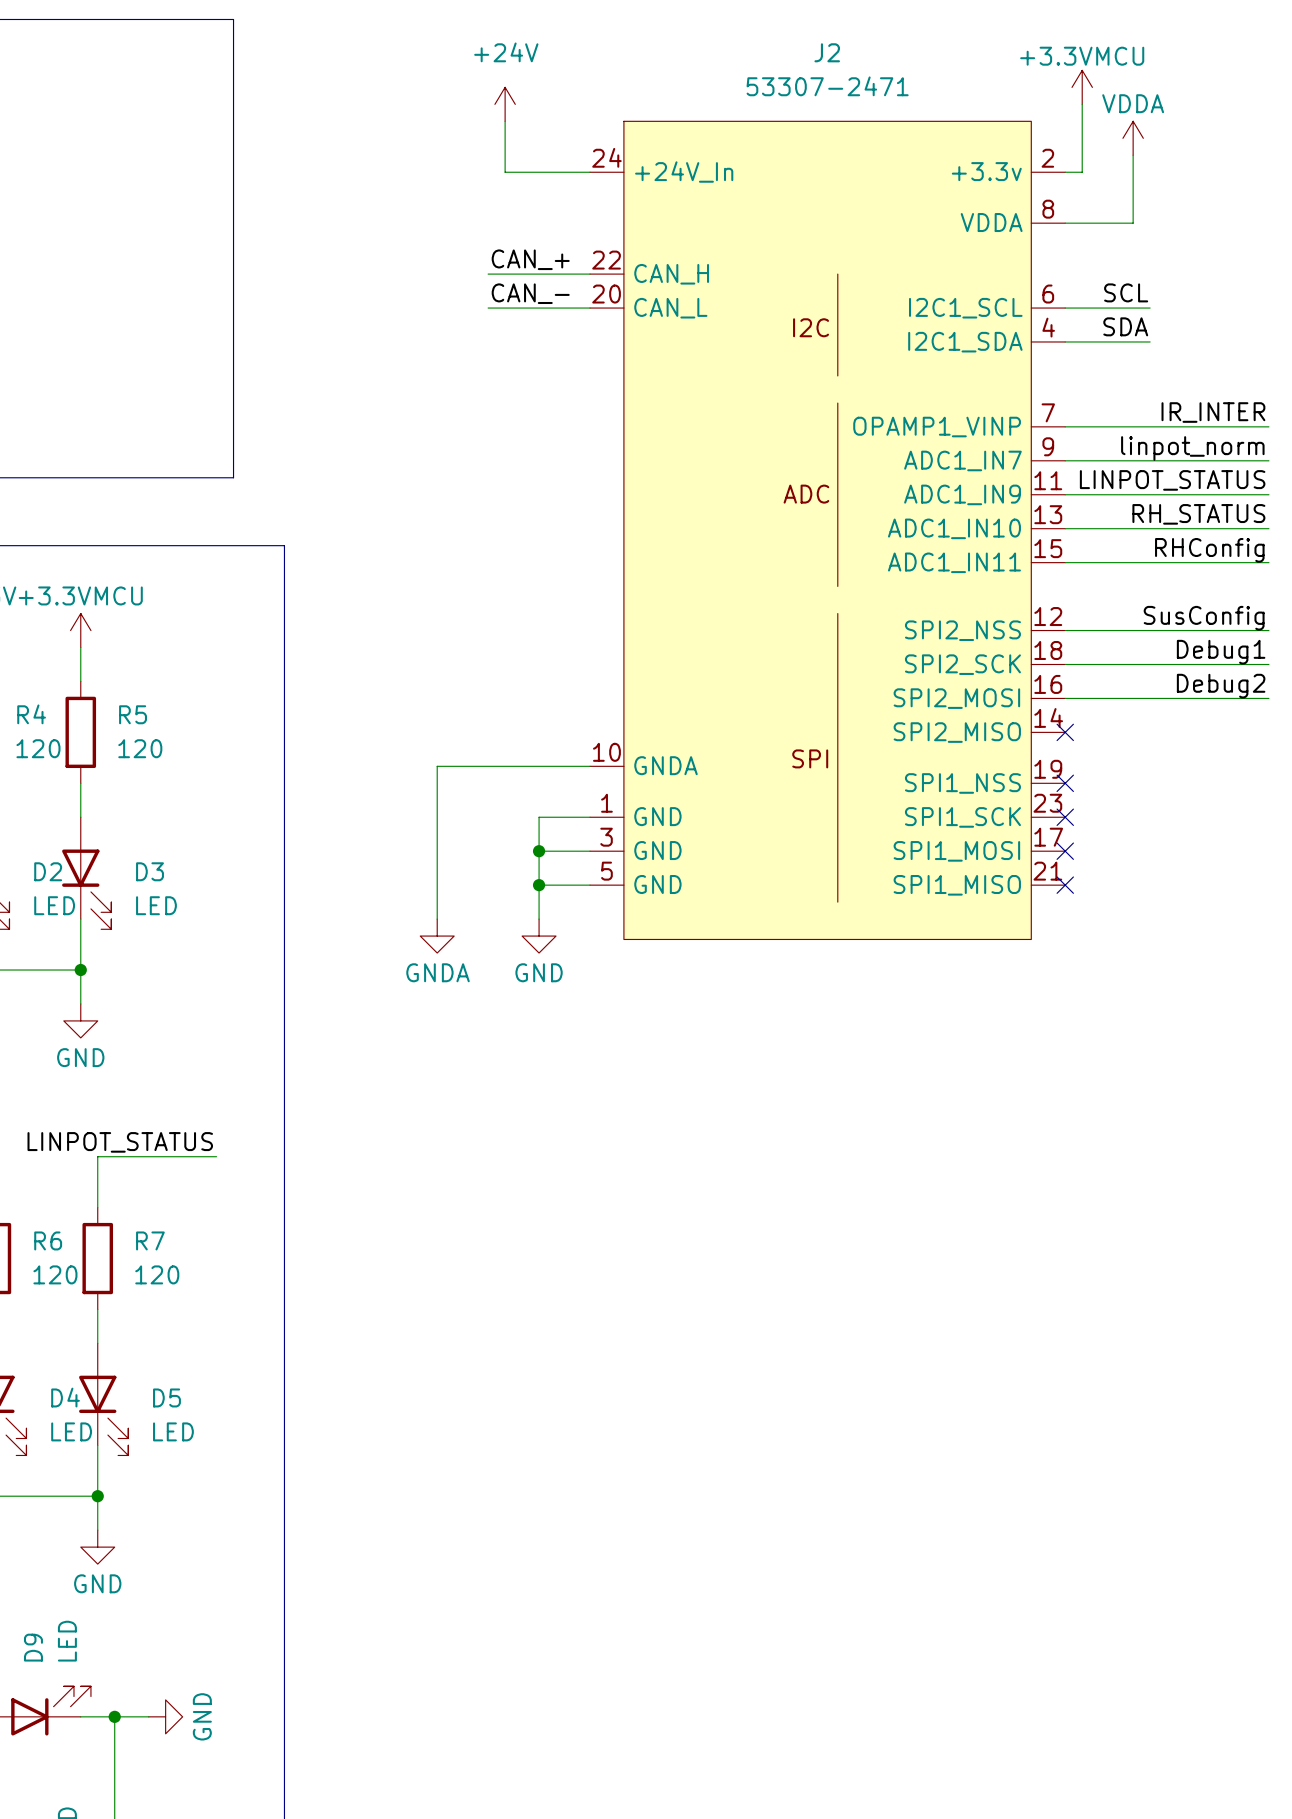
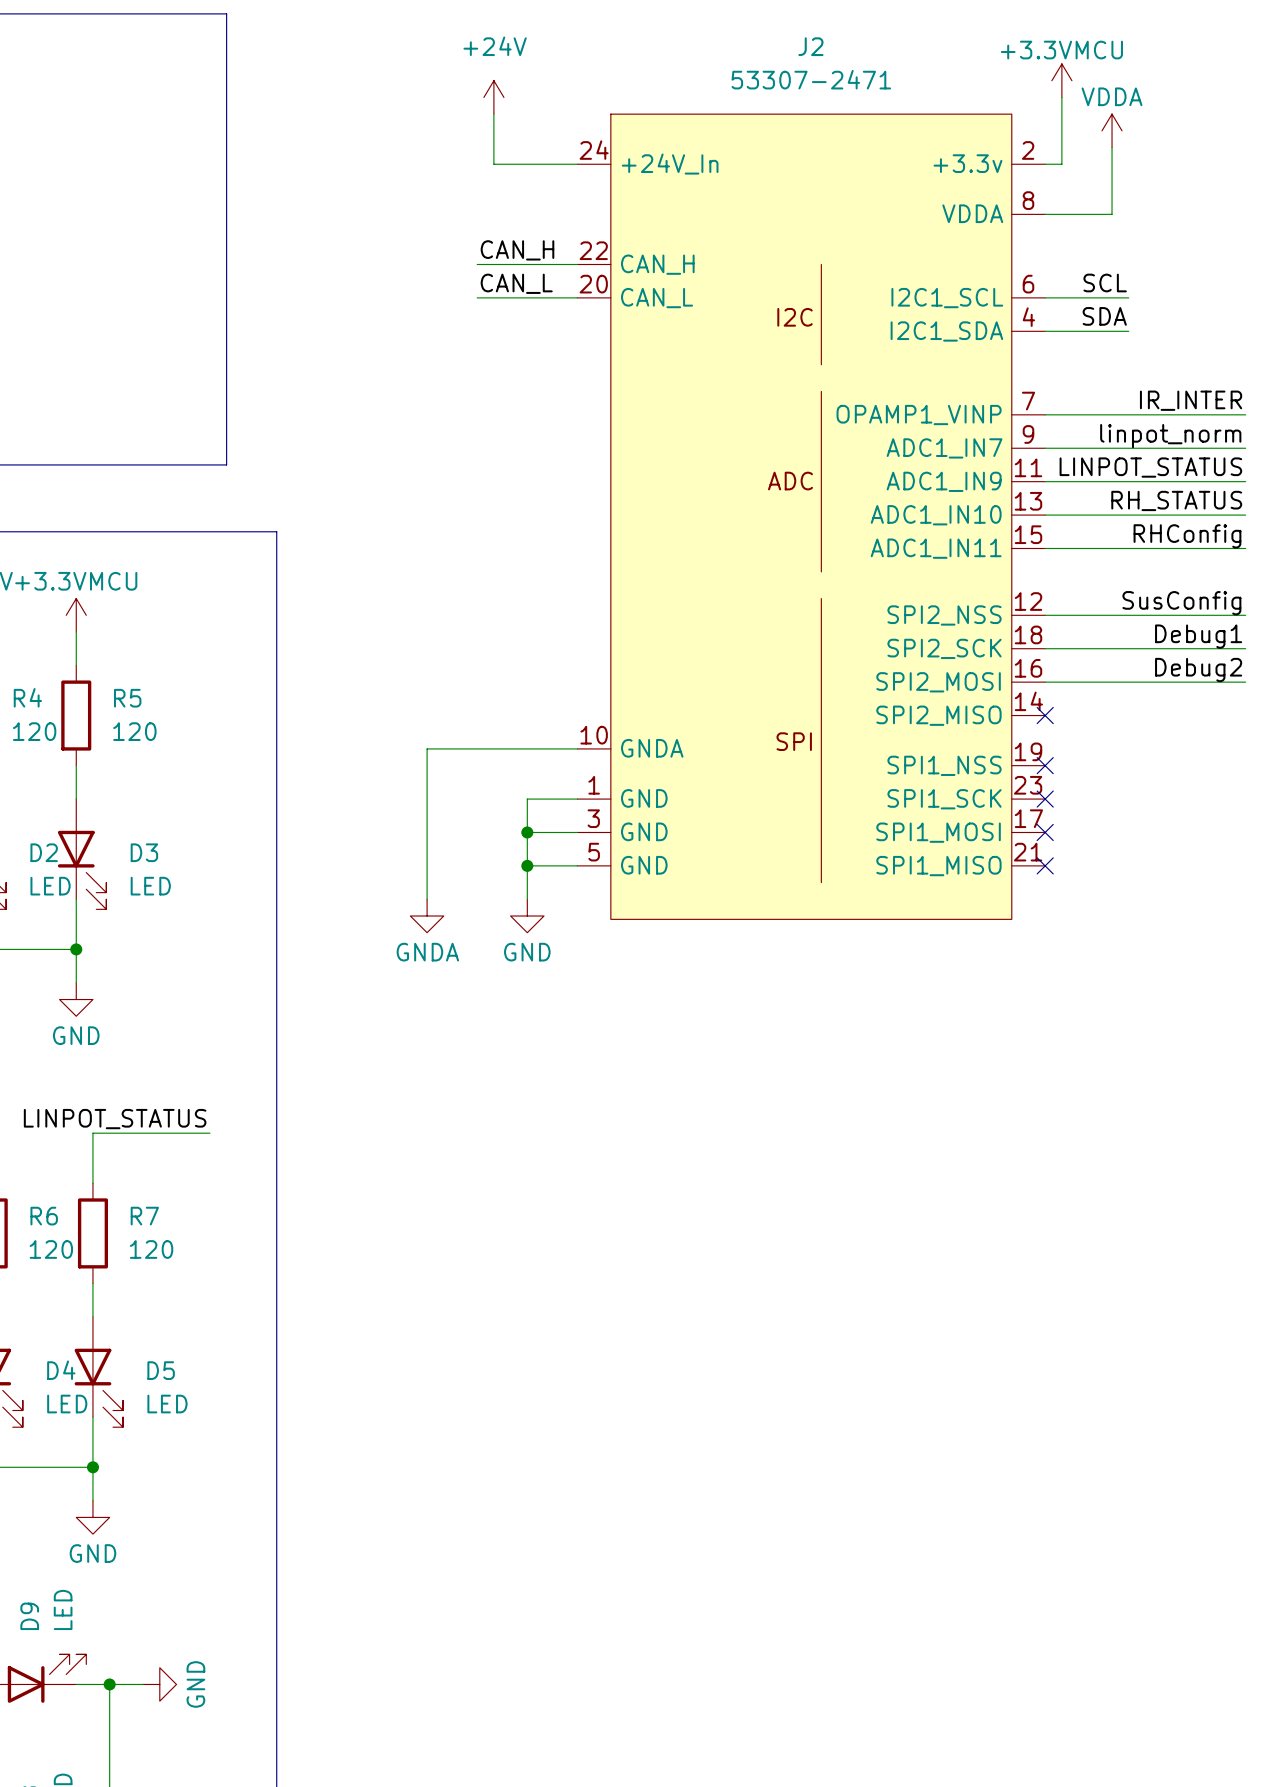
label: CAN_+ (530, 259) -> CAN_H (517, 250)
label: CAN_- (530, 293) -> CAN_L (516, 283)

